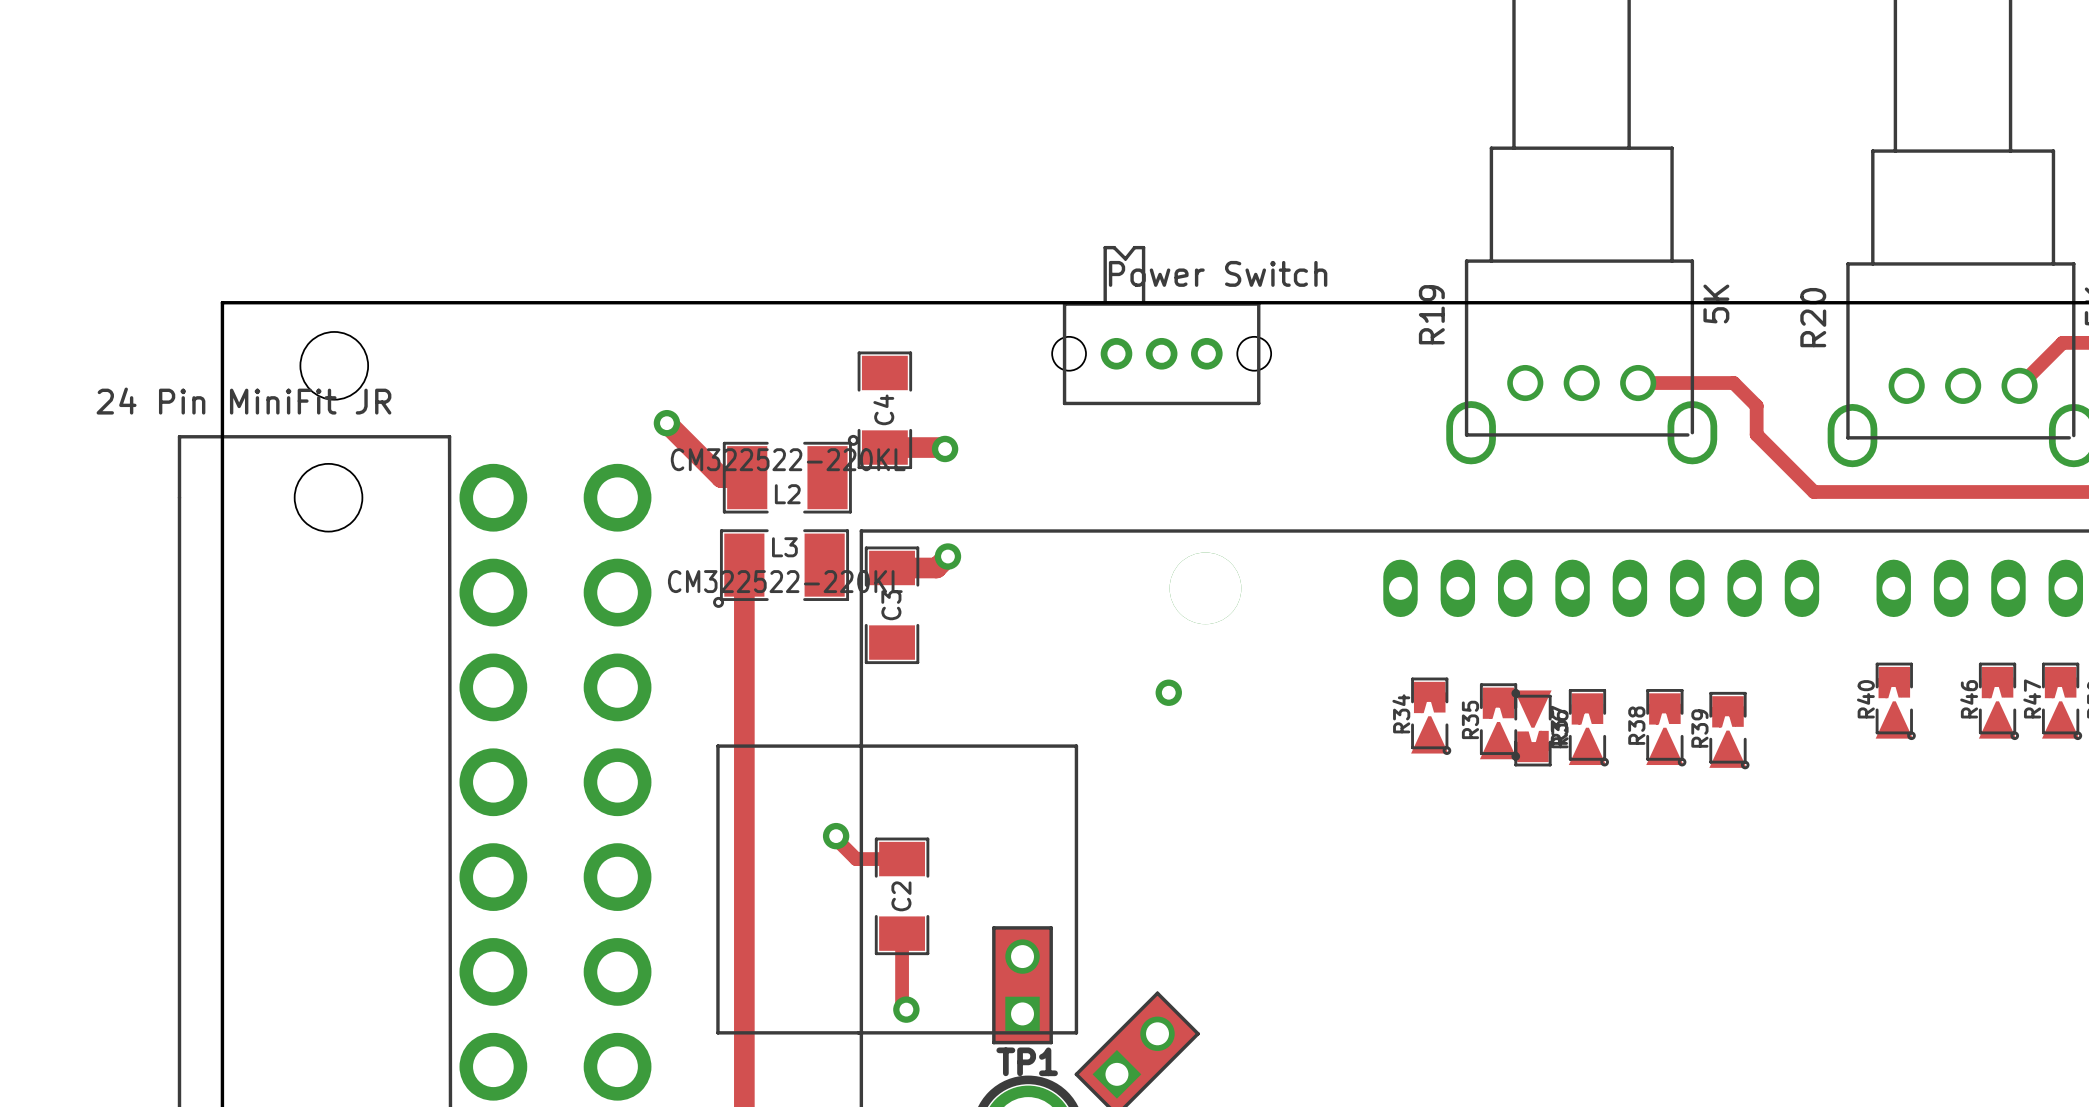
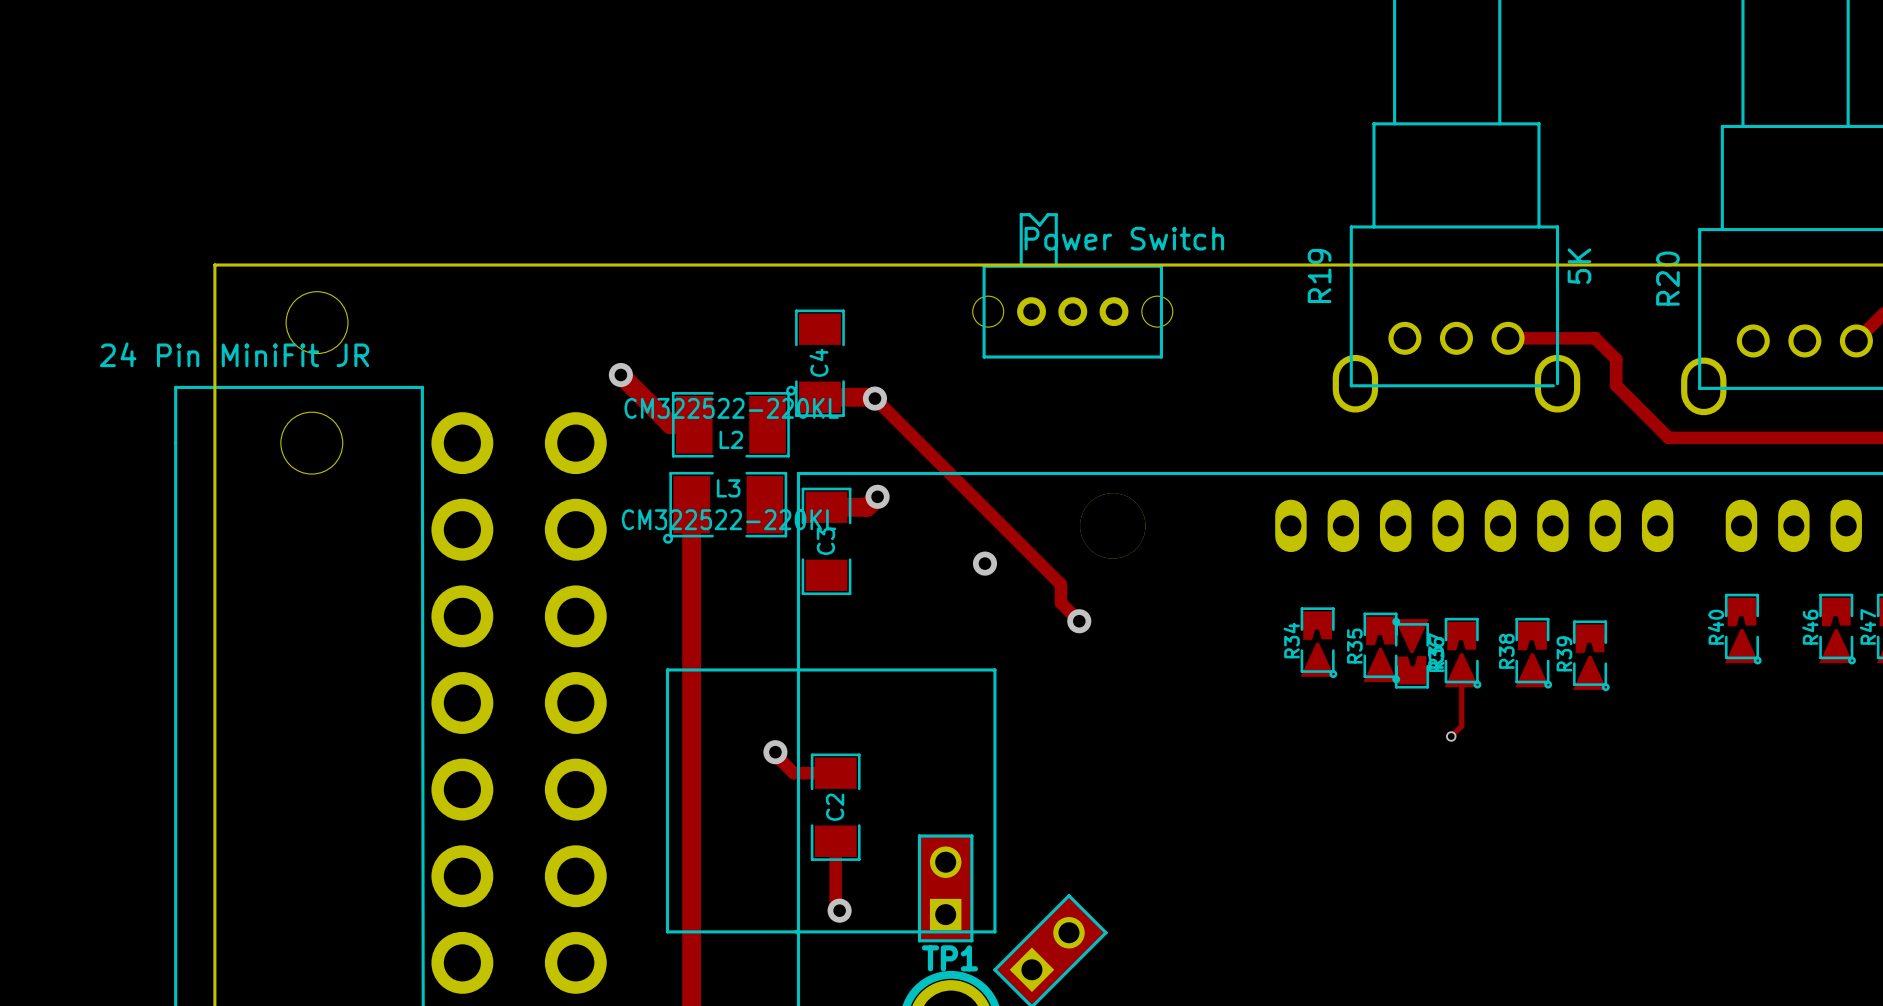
track: none -> (874, 398) (1060, 584) (1060, 602) (1079, 621)
via: none -> (984, 563)
track: none -> (1461, 670) (1461, 726) (1451, 736)
via: none -> (1451, 736)

